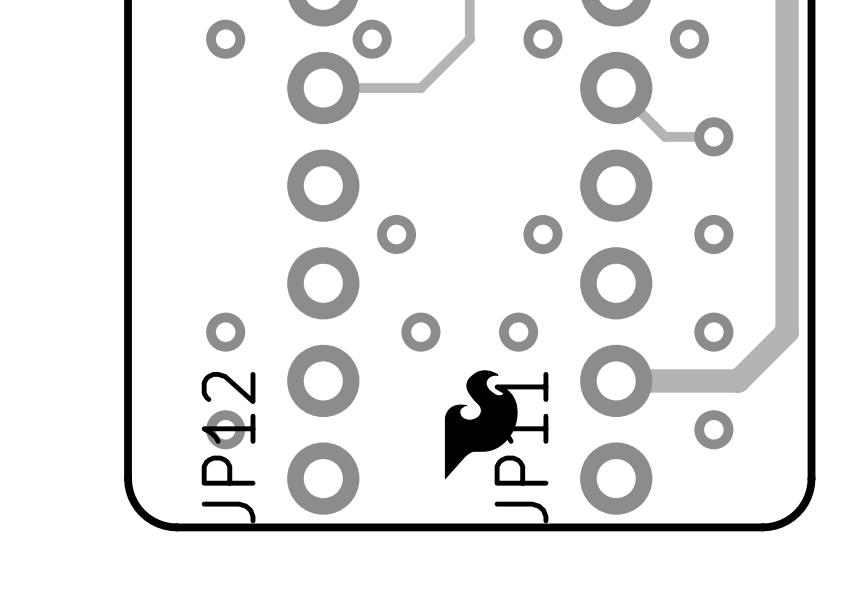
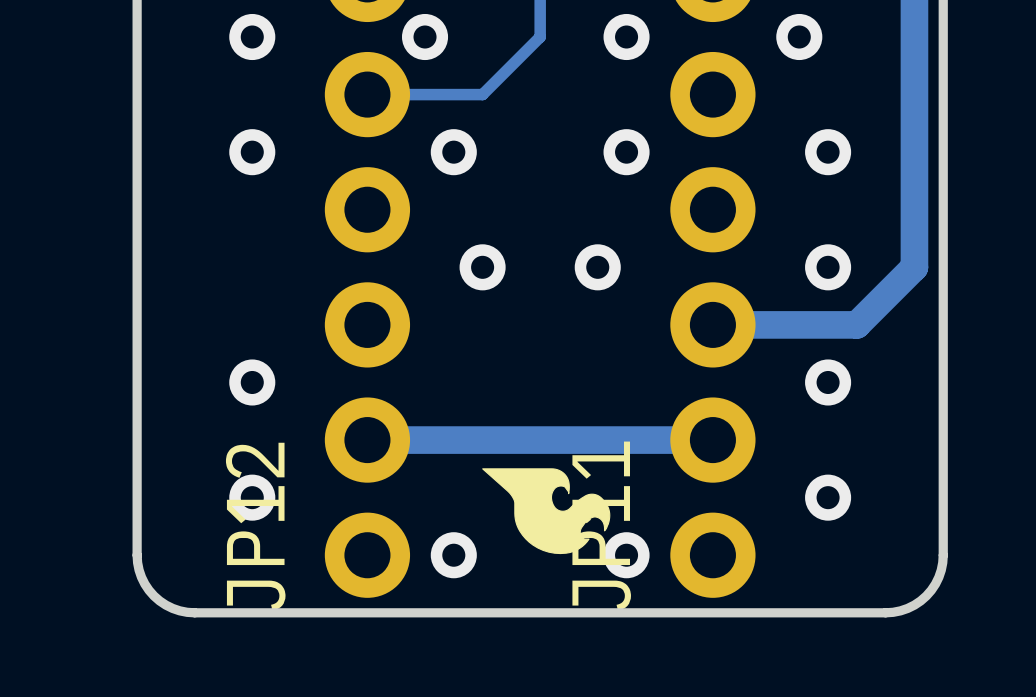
track: (616, 88) (665, 136) (713, 136) -> none
via: none -> (252, 152)
via: none -> (453, 152)
via: none -> (626, 152)
via position: (396, 234) -> (482, 267)
via position: (543, 234) -> (597, 267)
track: (787, 234) (787, 332) (738, 380) (616, 380) -> (914, 267) (856, 324) (712, 324)
via: (420, 332) -> none
via: (518, 332) -> none
drawing shape: [444, 370, 518, 479] -> [482, 468, 611, 555]
track: none -> (712, 440) (367, 440)
via: none -> (453, 555)
via: none -> (626, 555)

